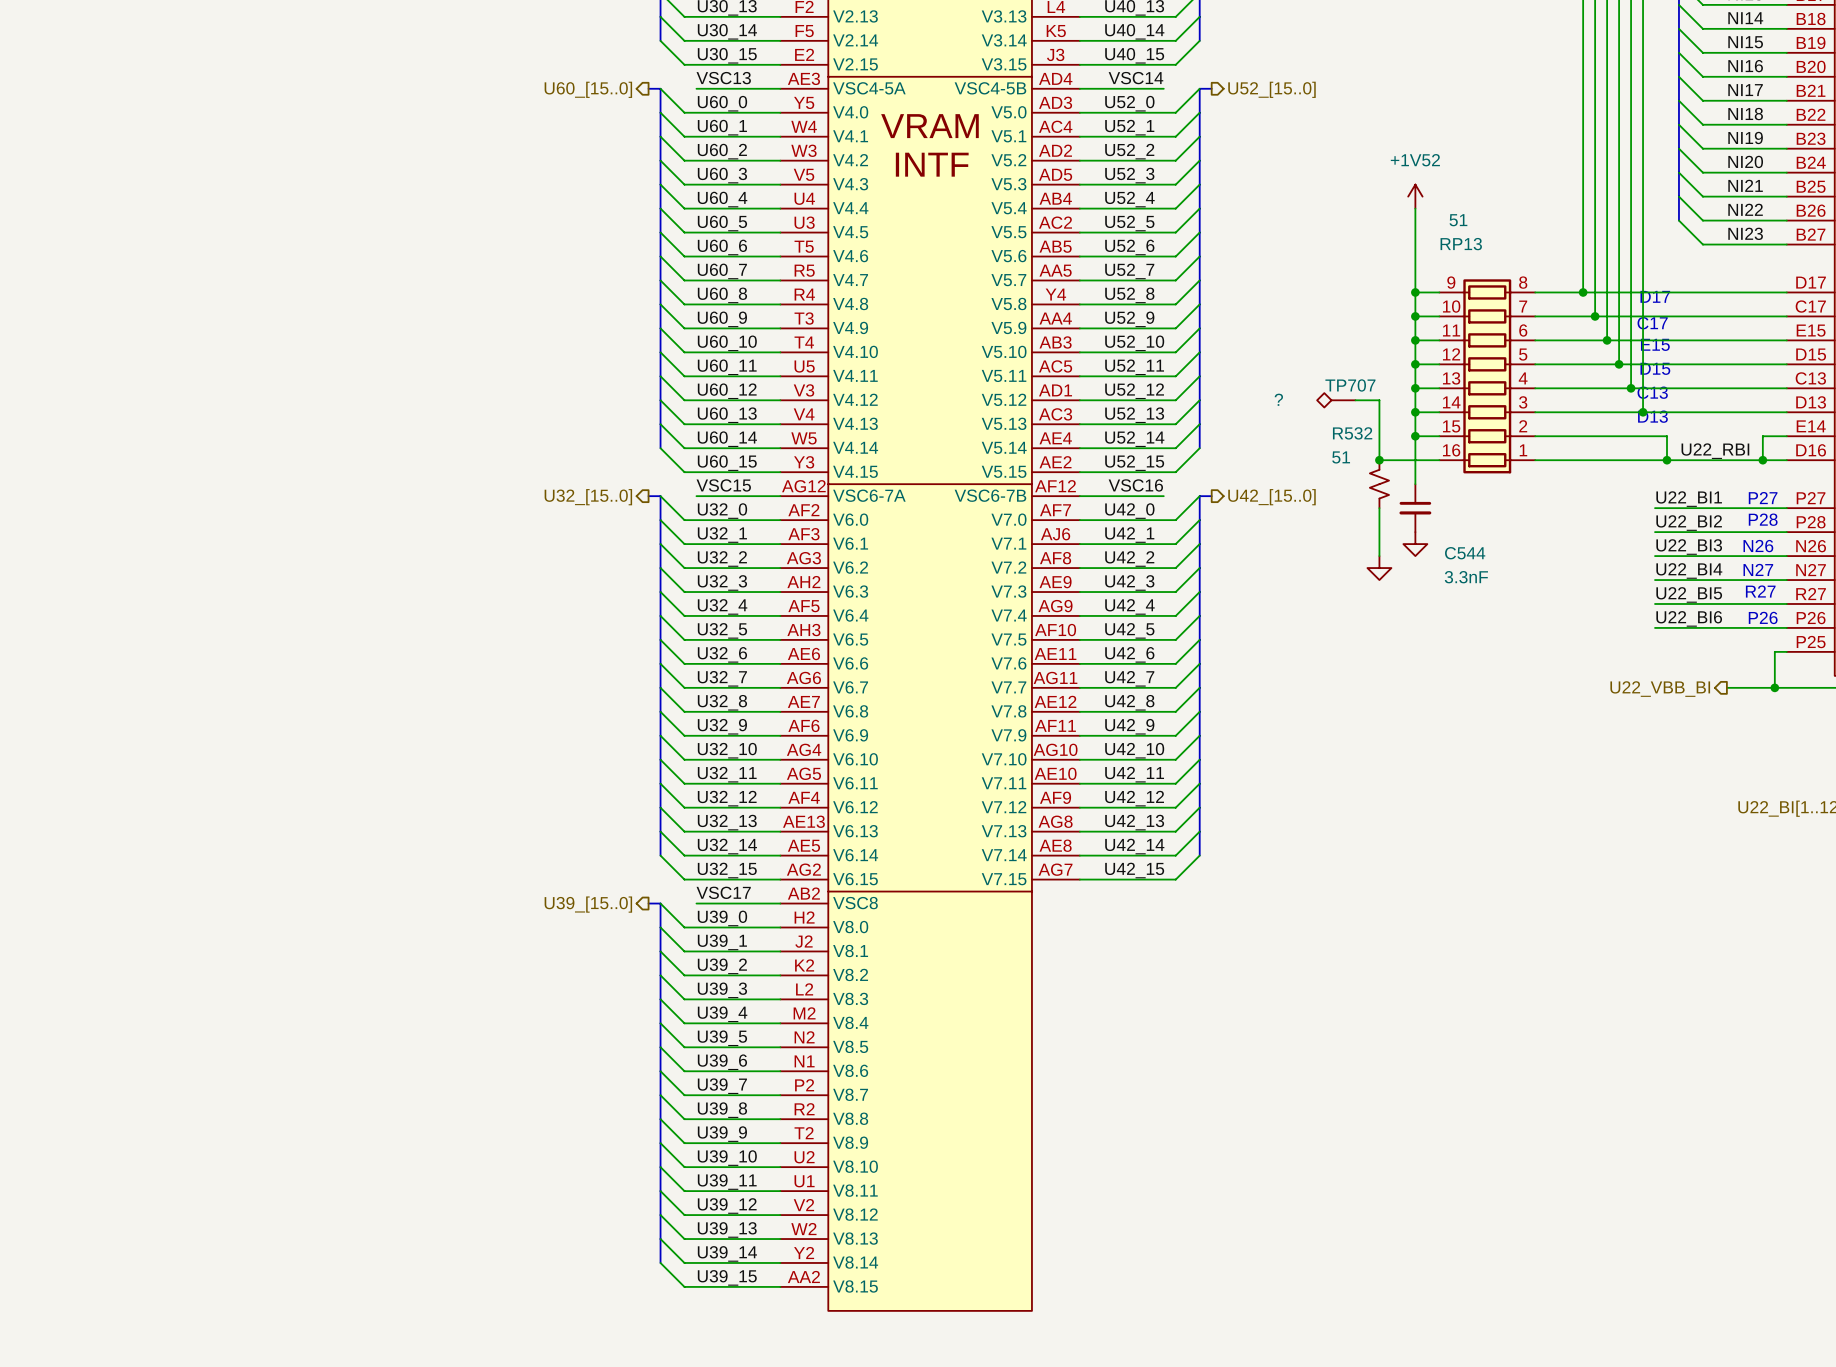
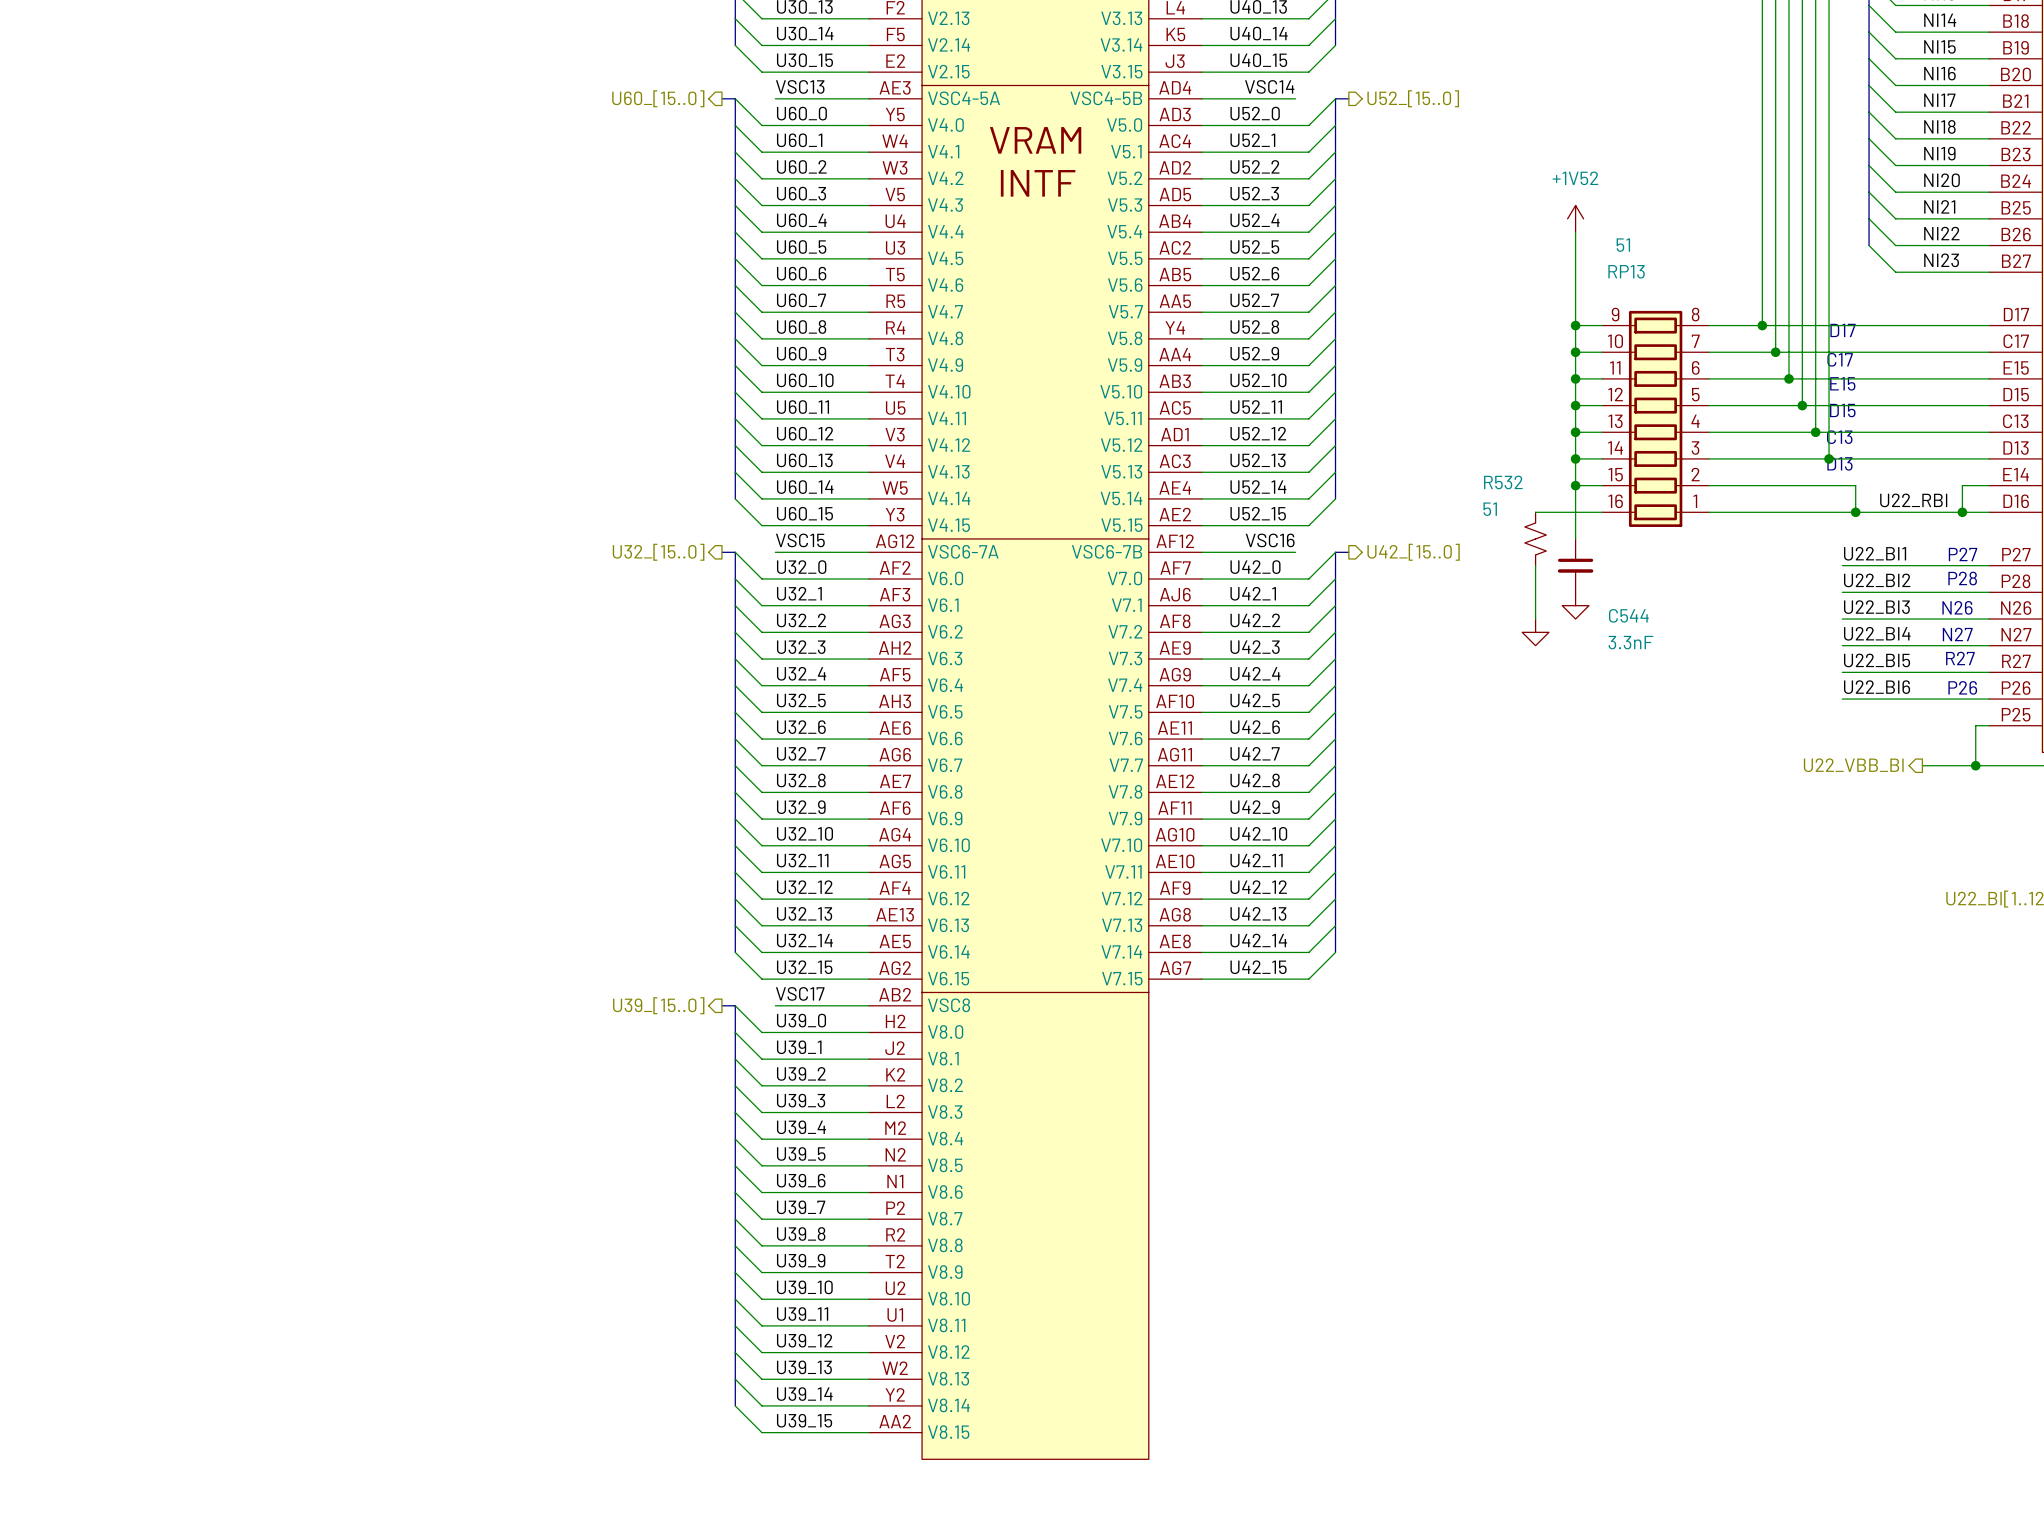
TP707: ? (1336, 400) -> none
wire: (1355, 400) (1379, 400) (1379, 460) -> none
junction: (1379, 460) -> none

